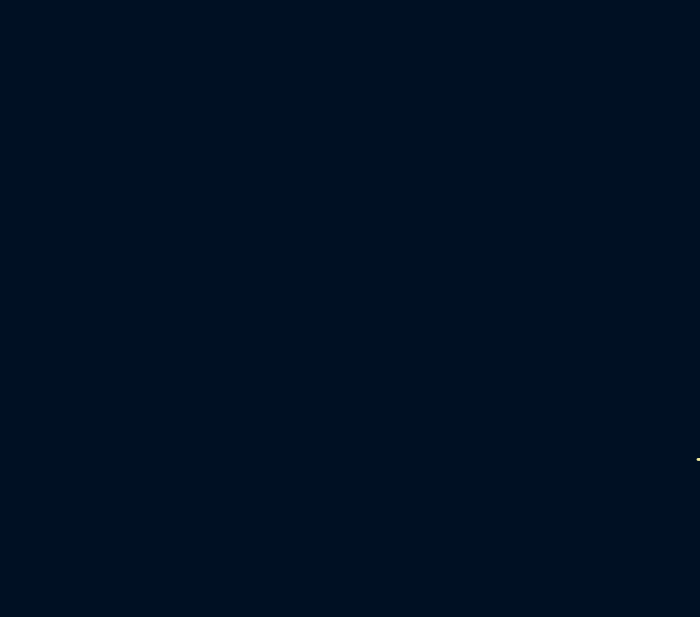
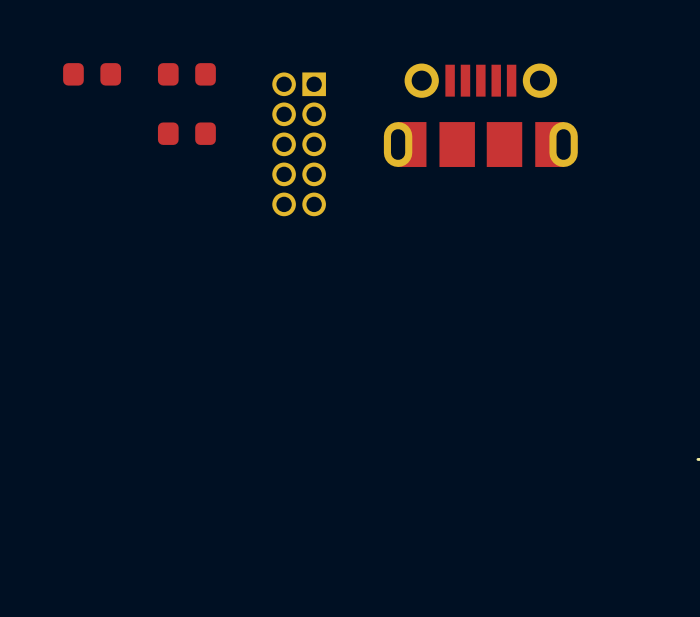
part: none -> (92, 74)
part: none -> (186, 74)
part: none -> (480, 115)
part: none -> (186, 133)
part: none -> (299, 144)

